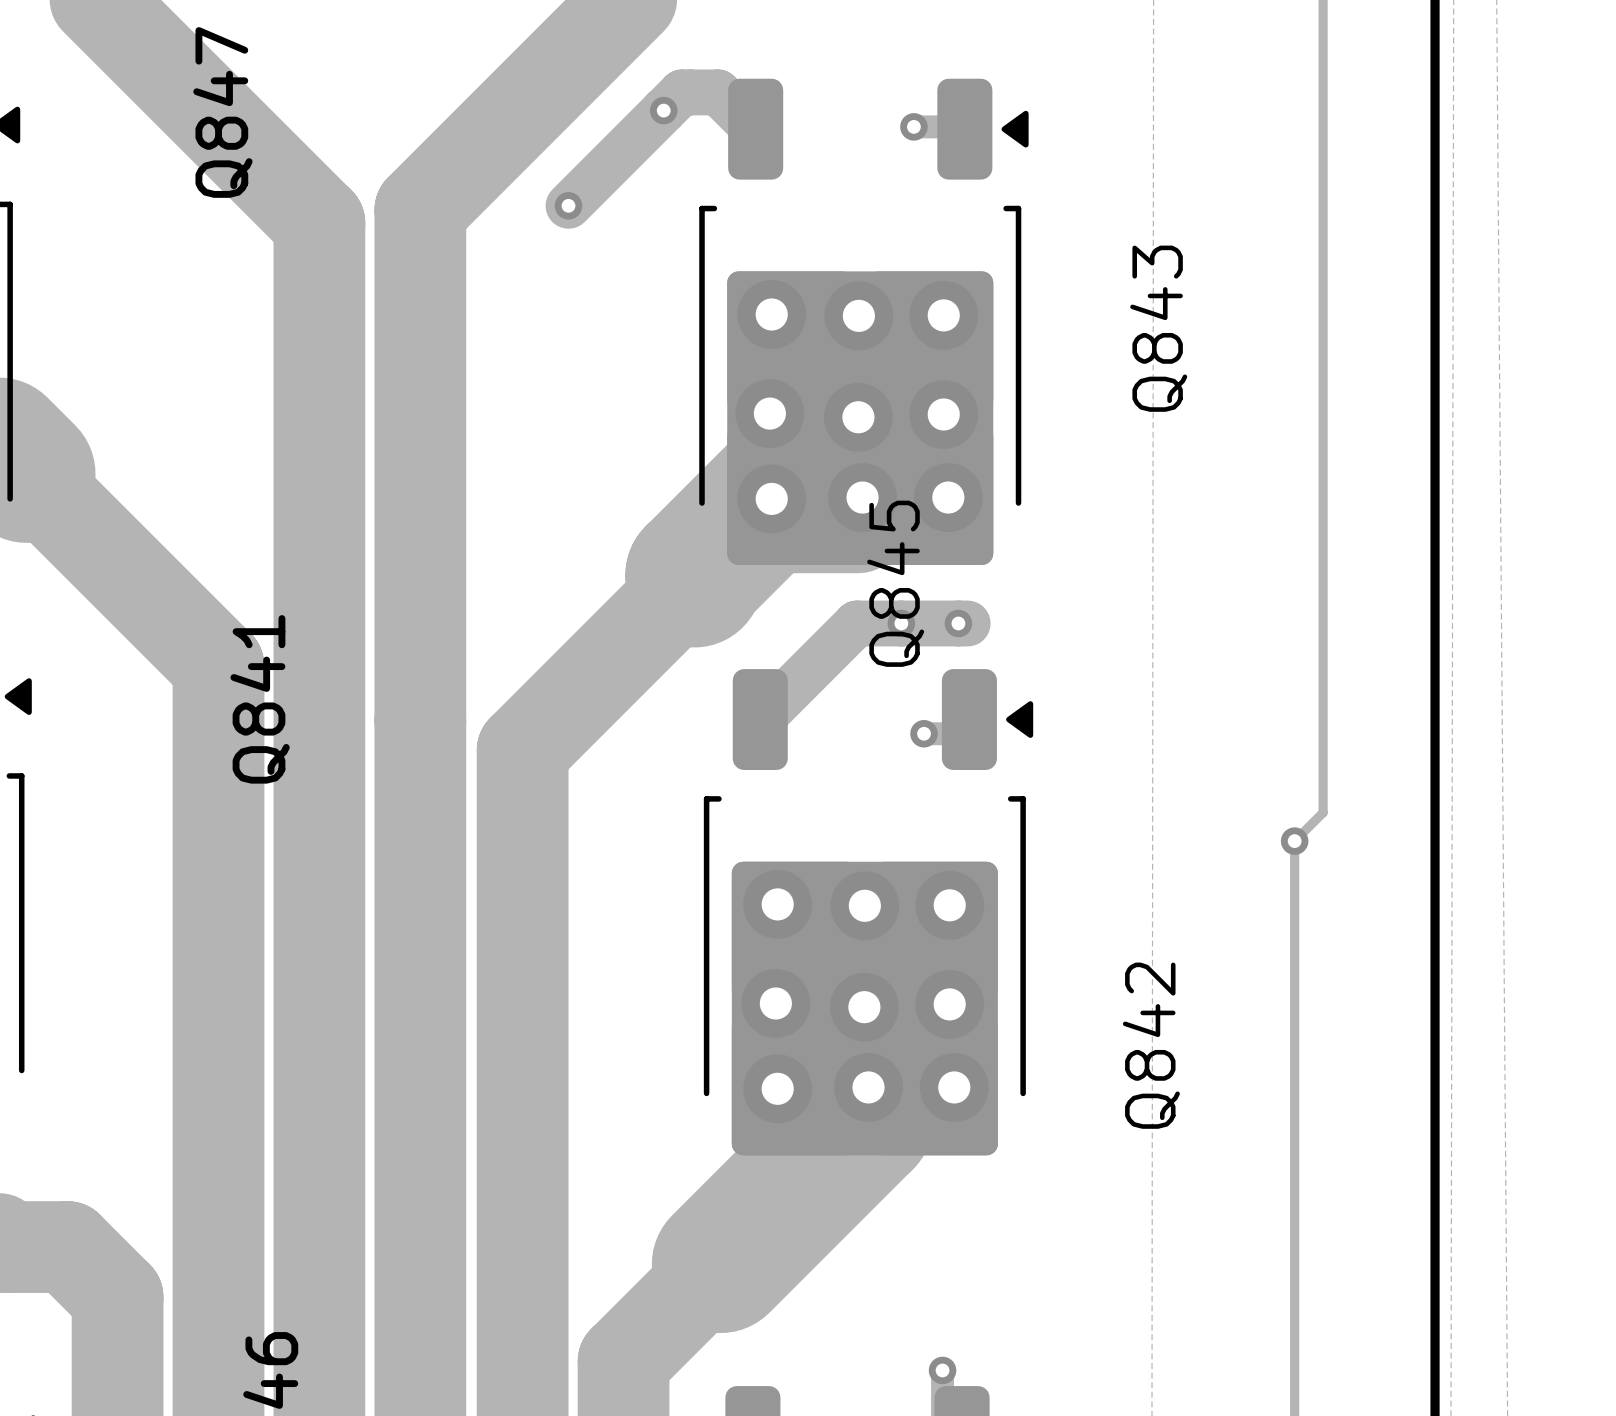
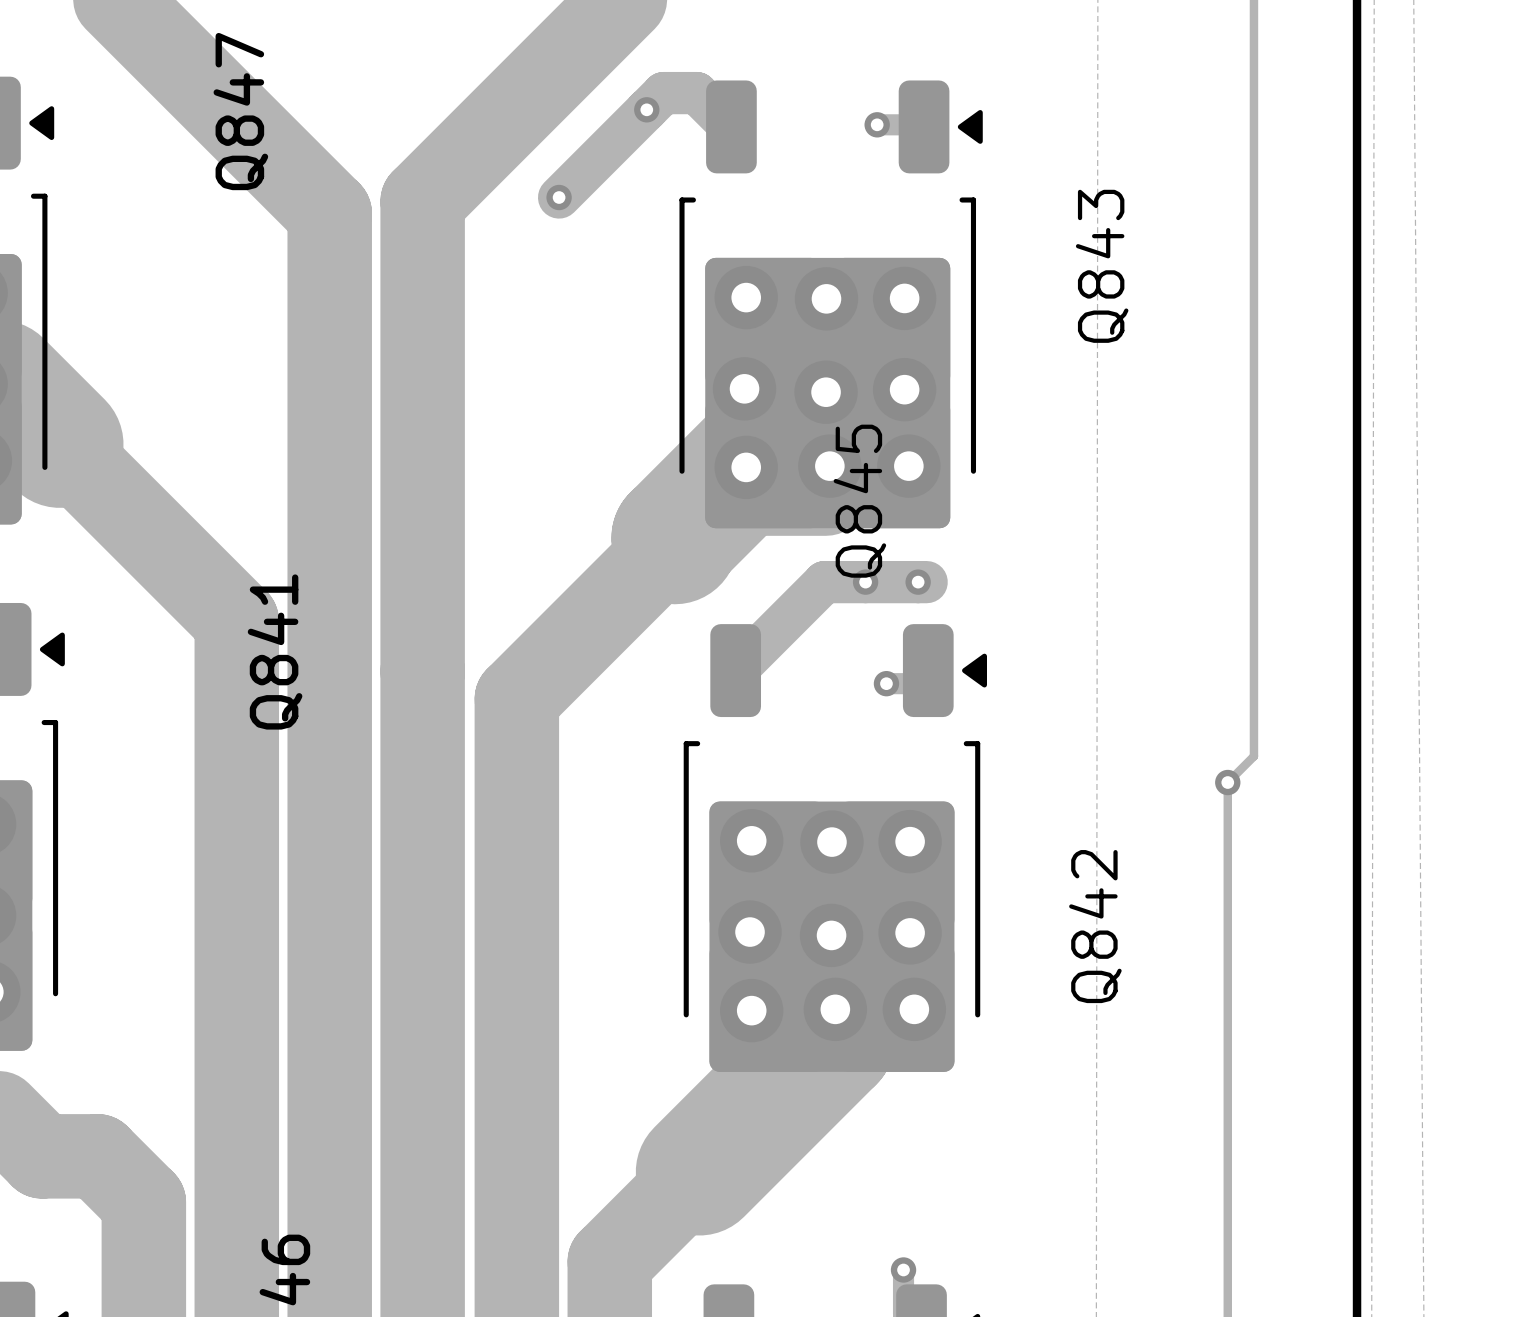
Q843 name position: Q843 (1158, 328) -> Q843 (1102, 266)
Q845 name position: Q845 (895, 583) -> Q845 (859, 501)
Q842 name position: Q842 (1151, 1045) -> Q842 (1095, 926)

